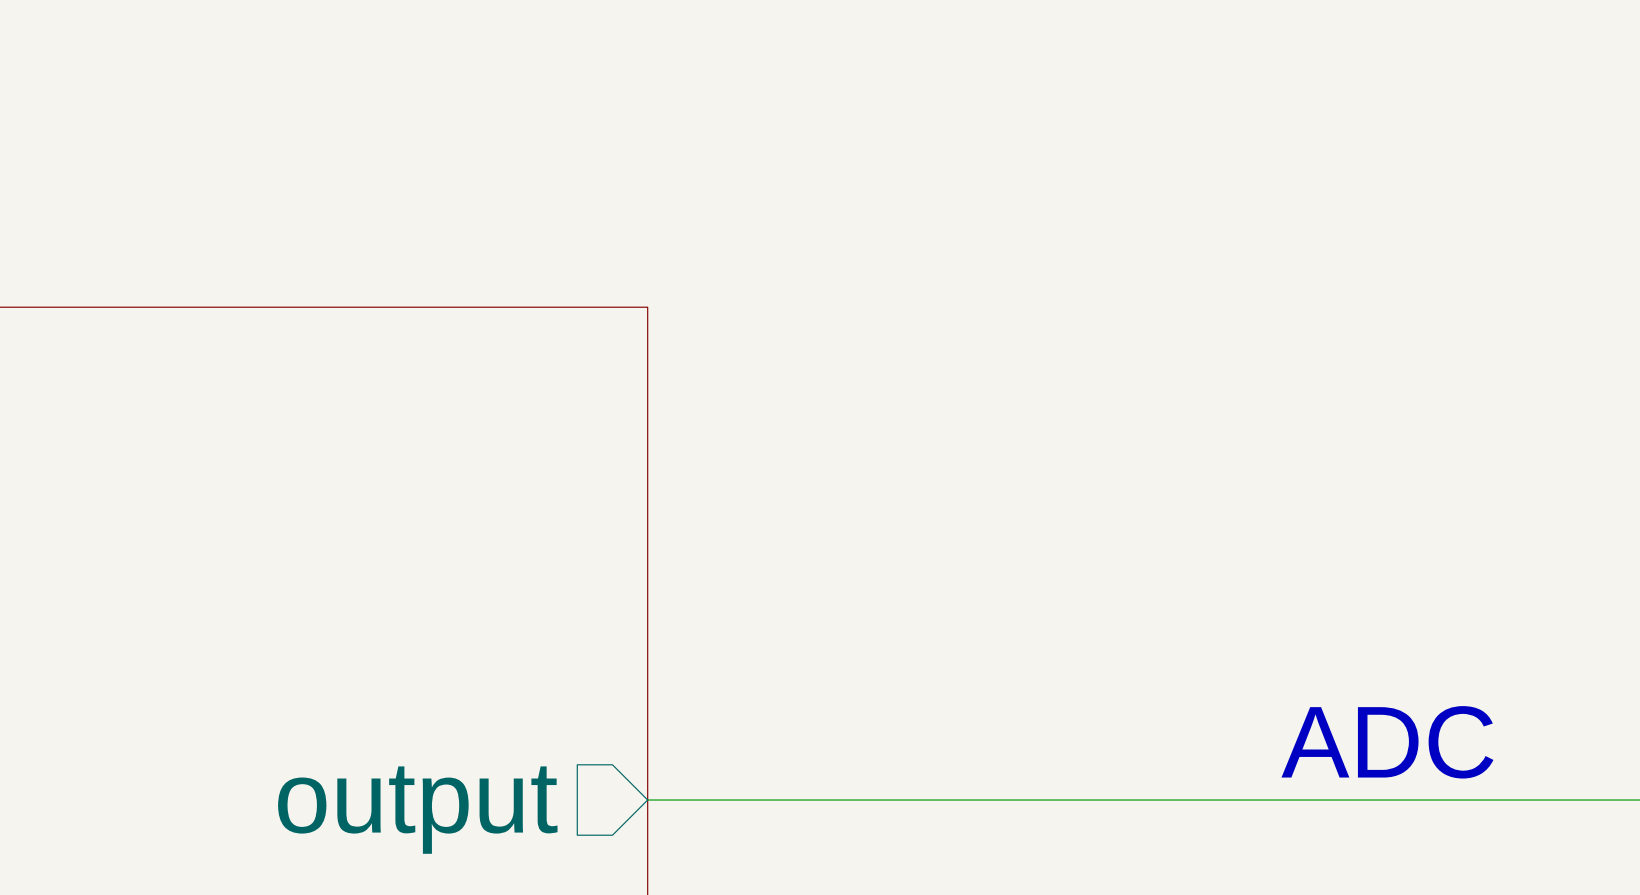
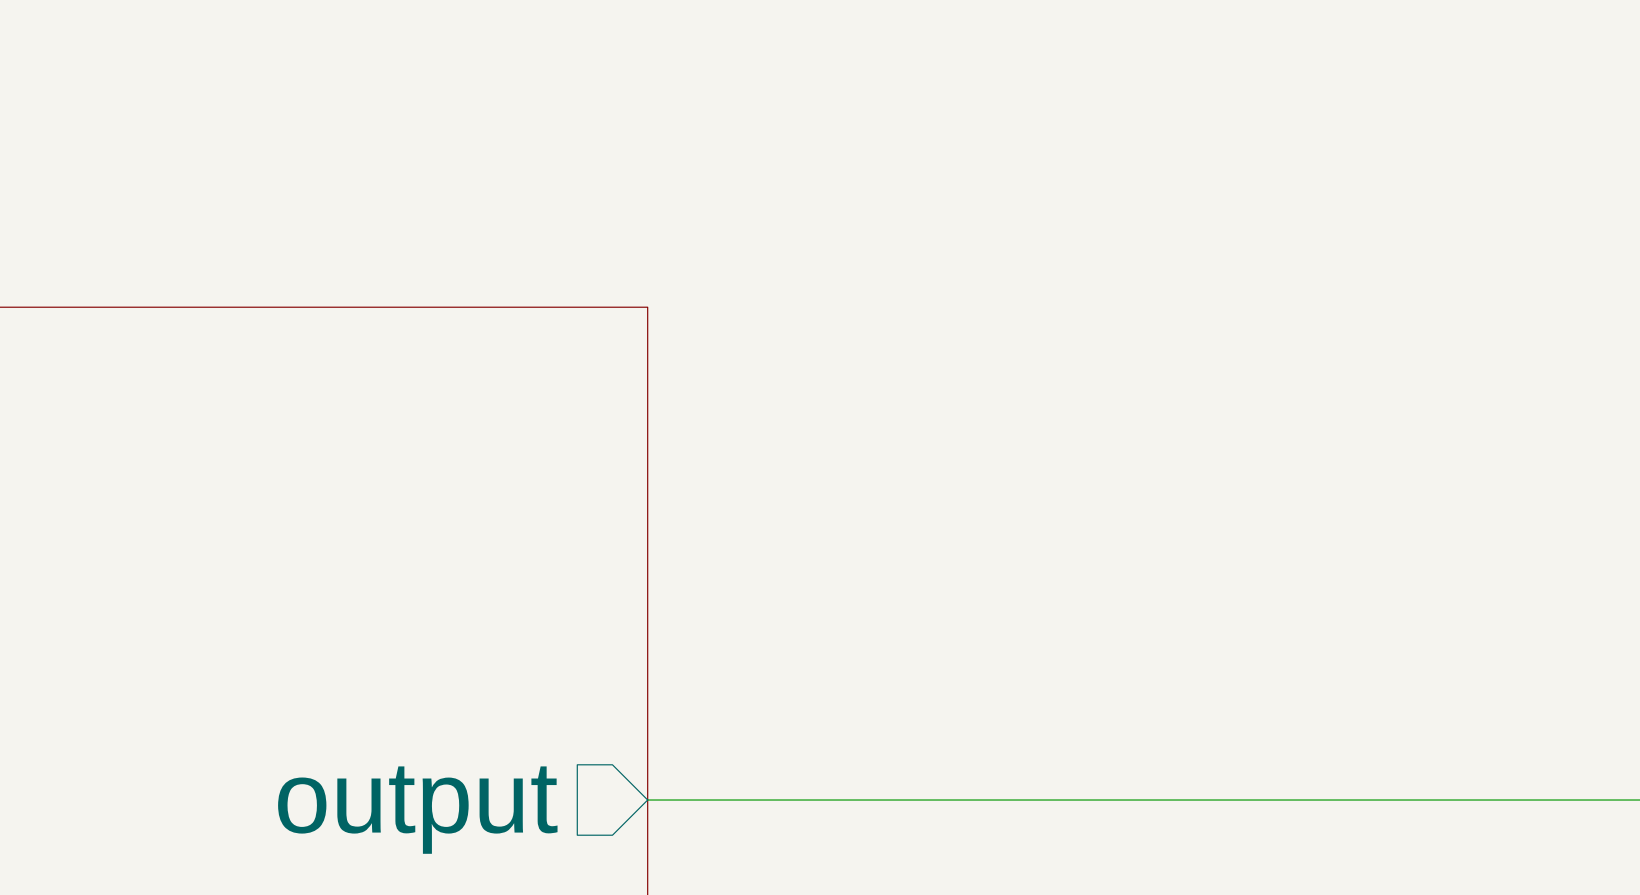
text: ADC (1387, 742) -> none

